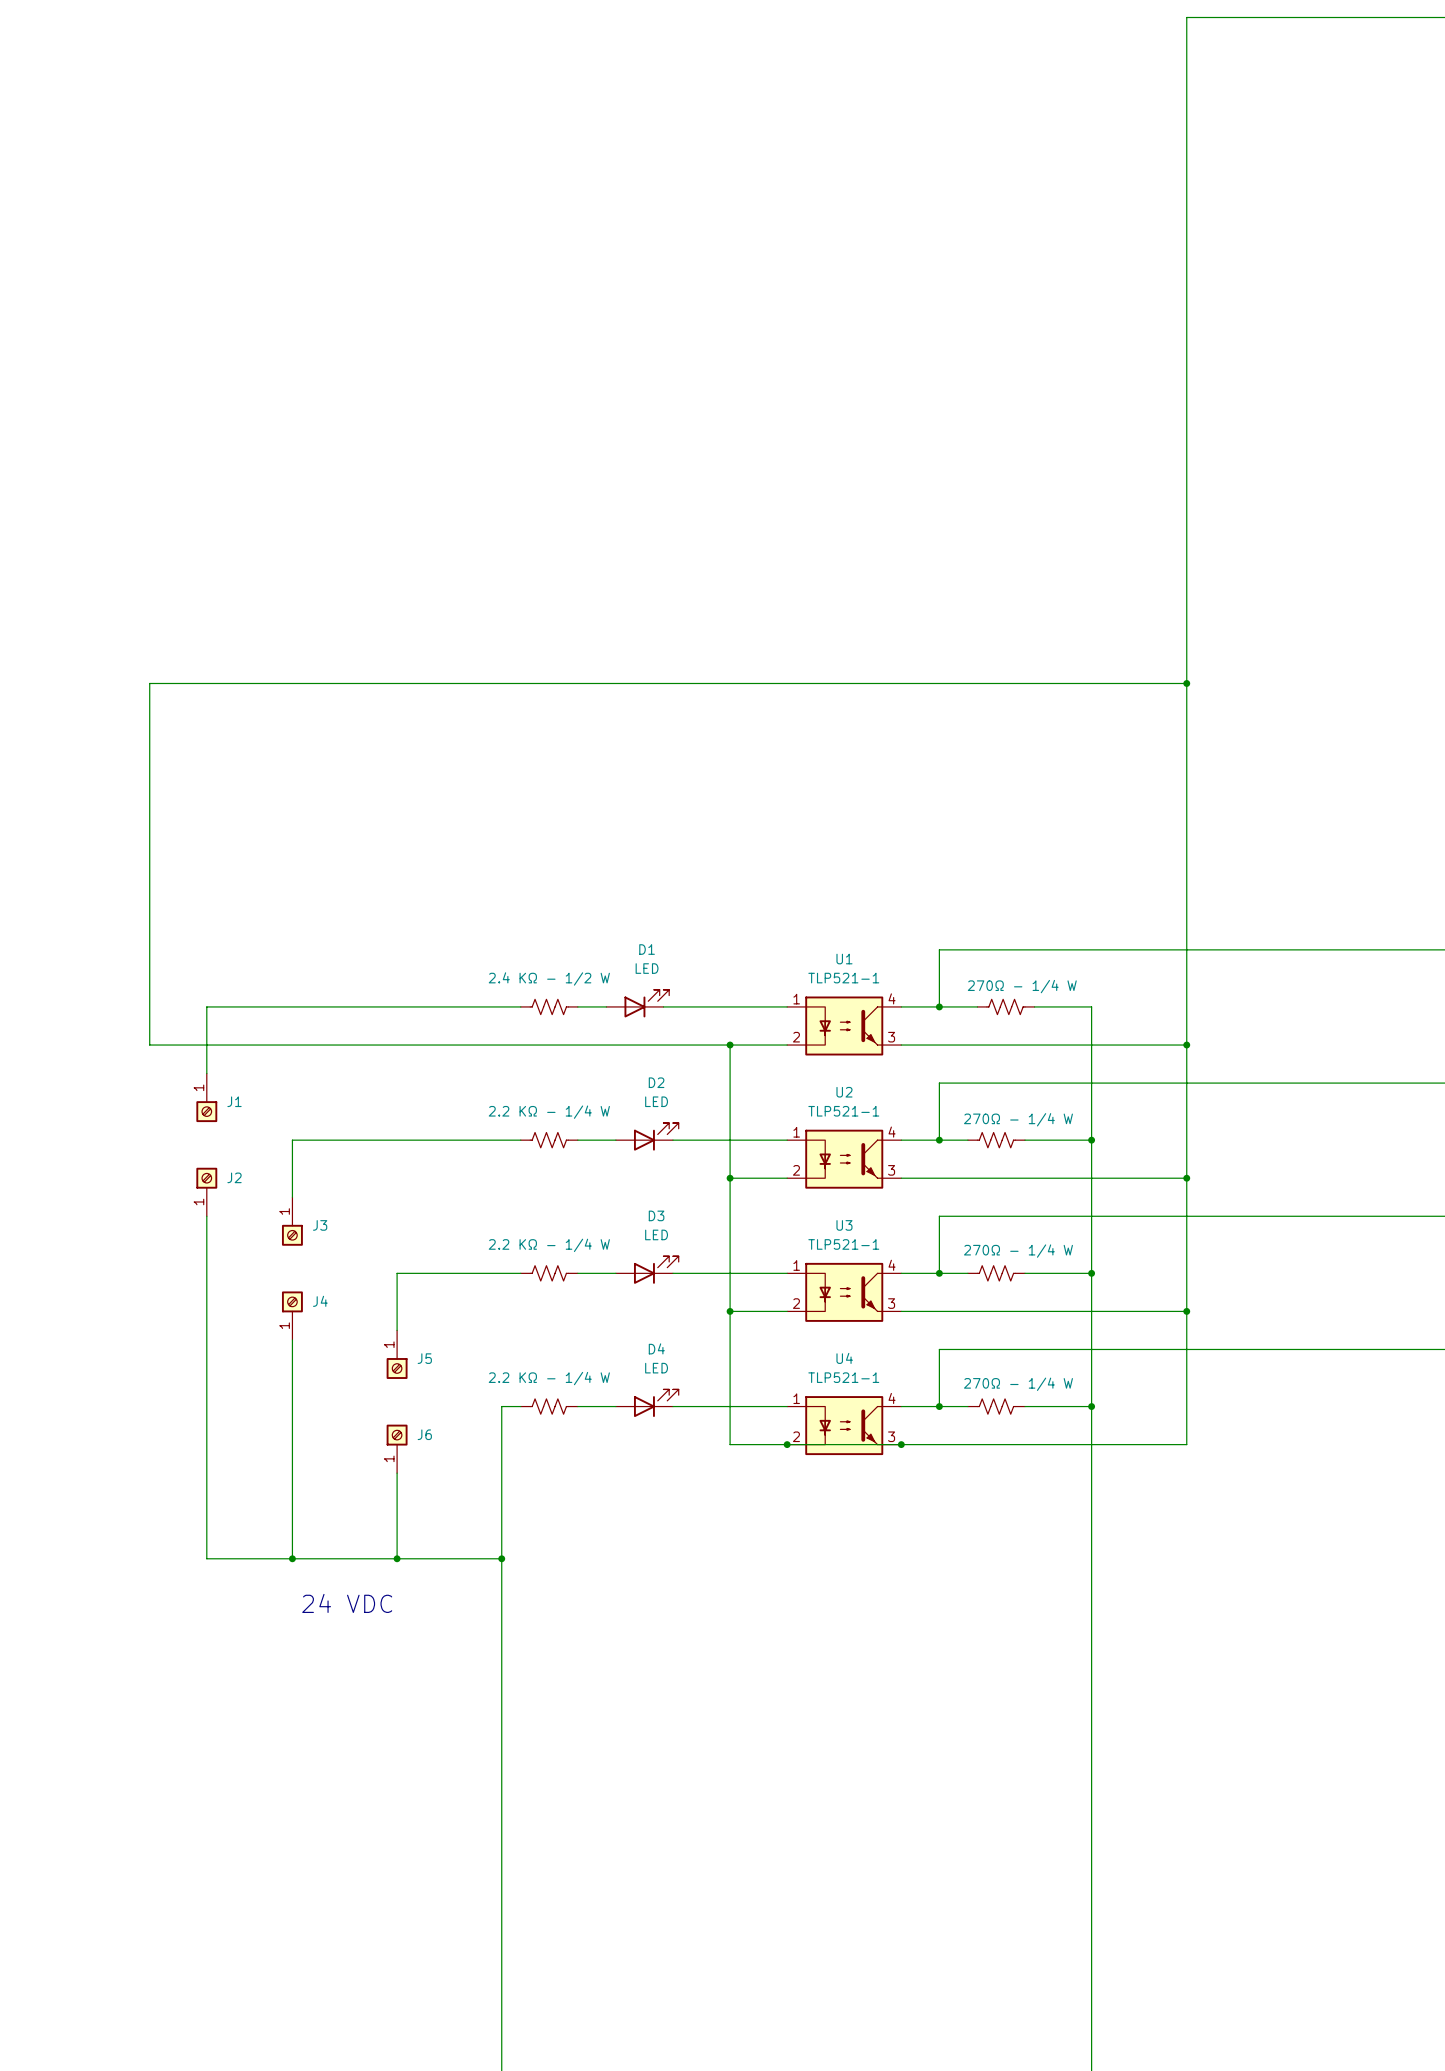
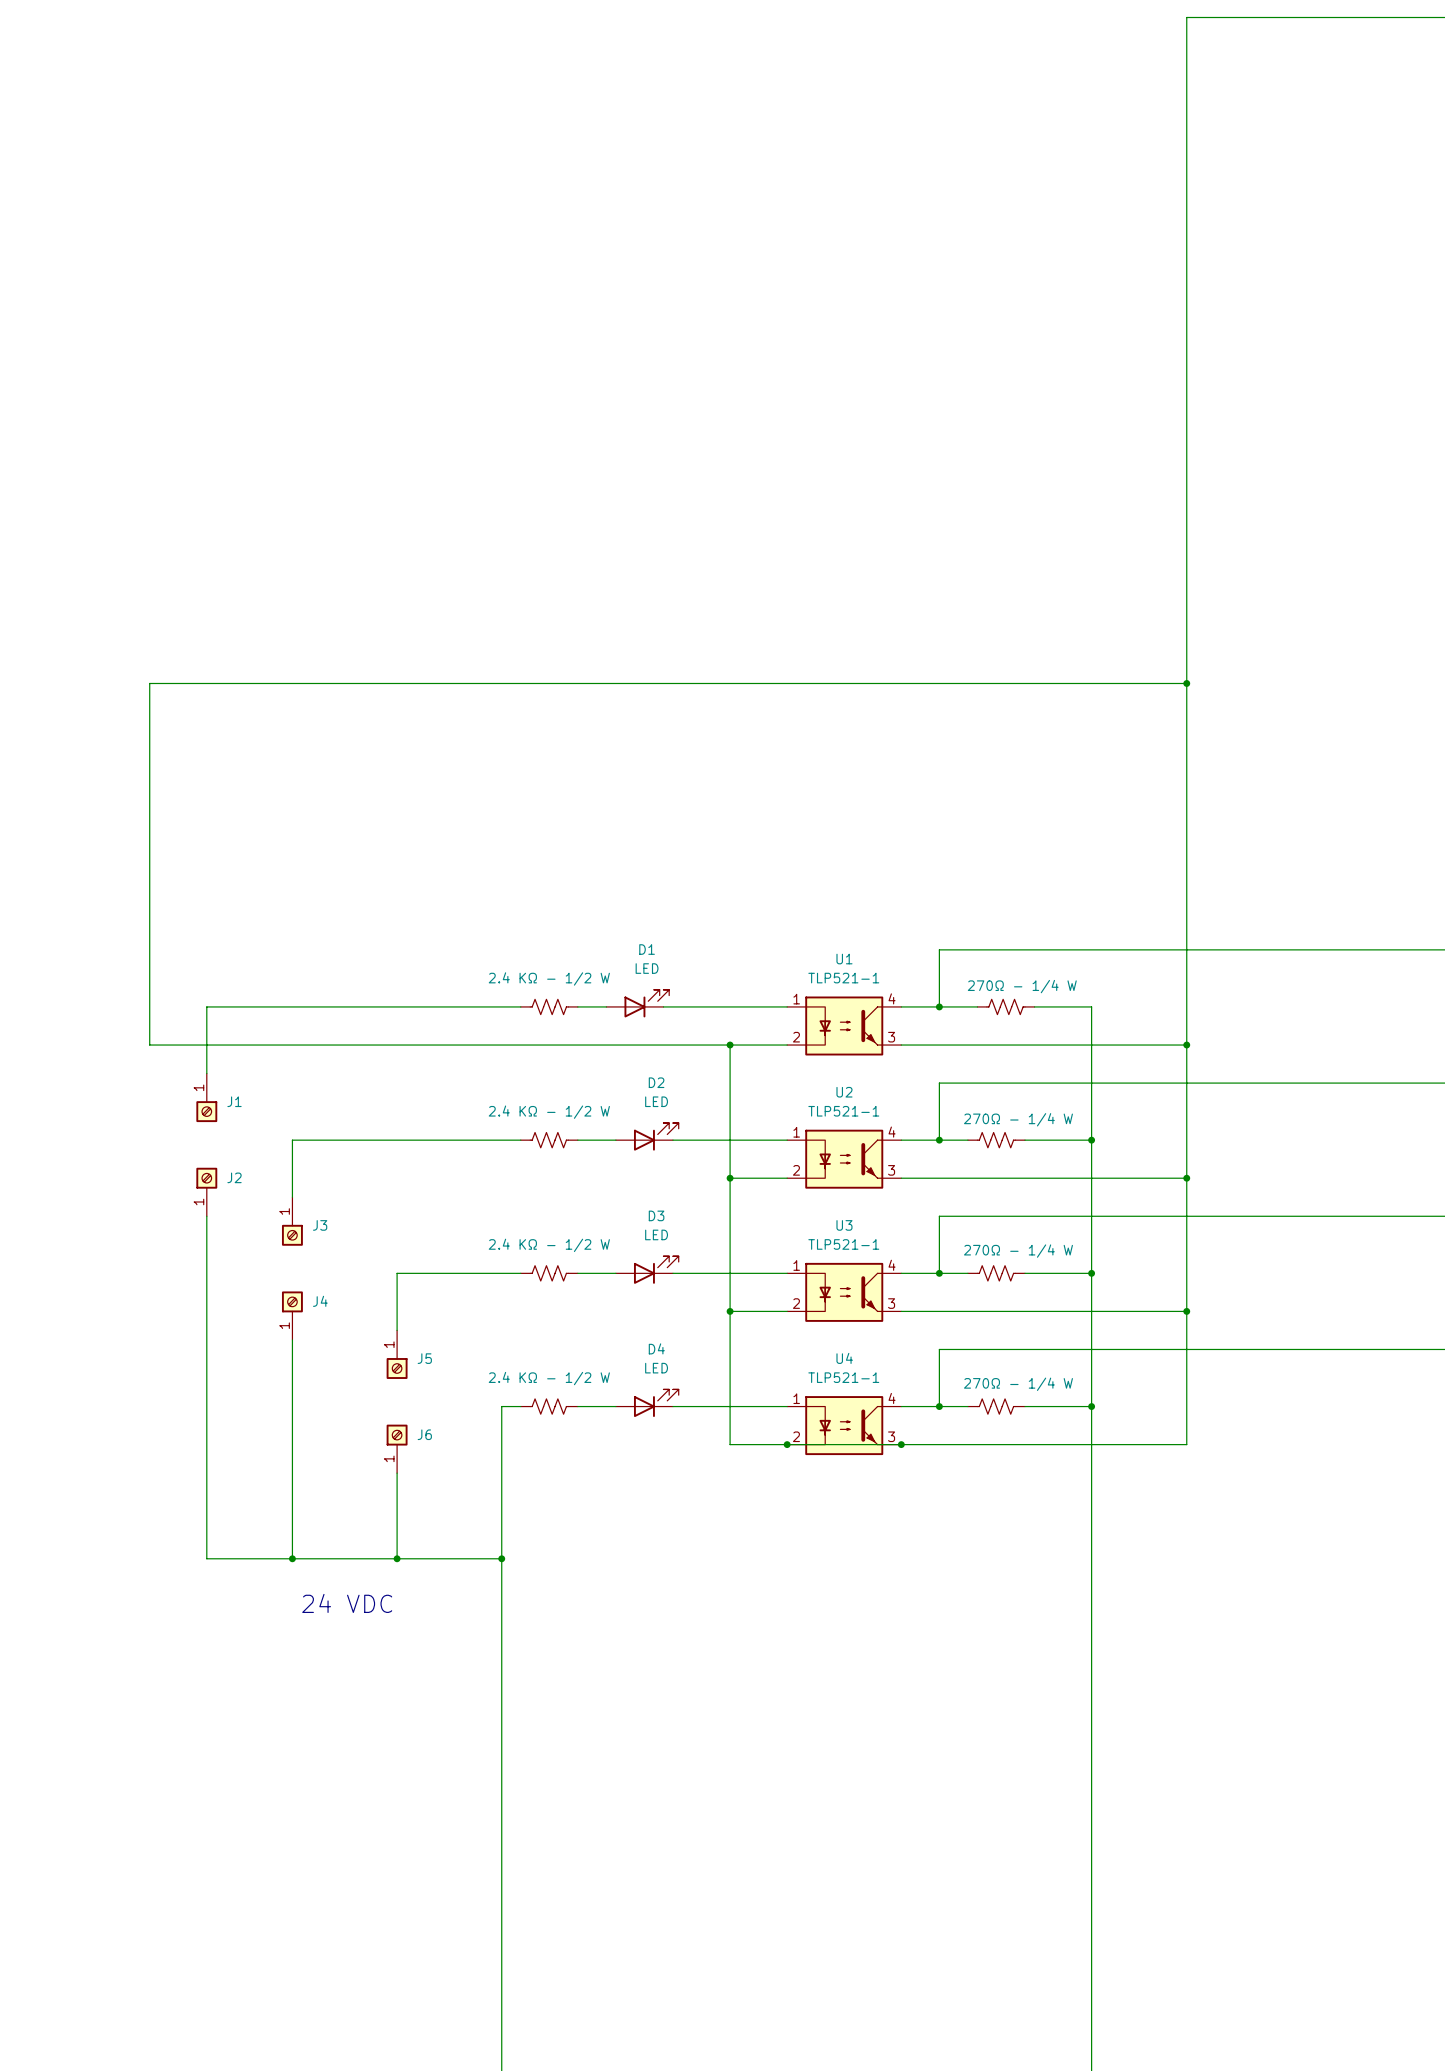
part value: 2.2 KΩ - 1/4 W (549, 1112) -> 2.4 KΩ - 1/2 W (549, 1112)
part value: 2.2 KΩ - 1/4 W (549, 1245) -> 2.4 KΩ - 1/2 W (549, 1245)
part value: 2.2 KΩ - 1/4 W (549, 1378) -> 2.4 KΩ - 1/2 W (549, 1378)

